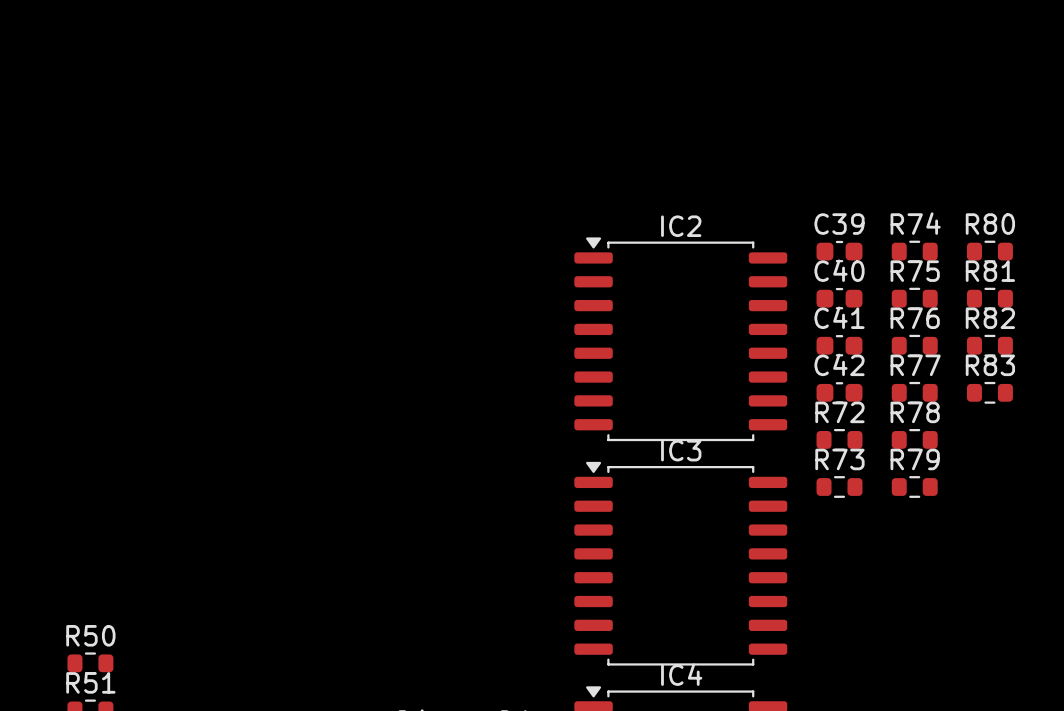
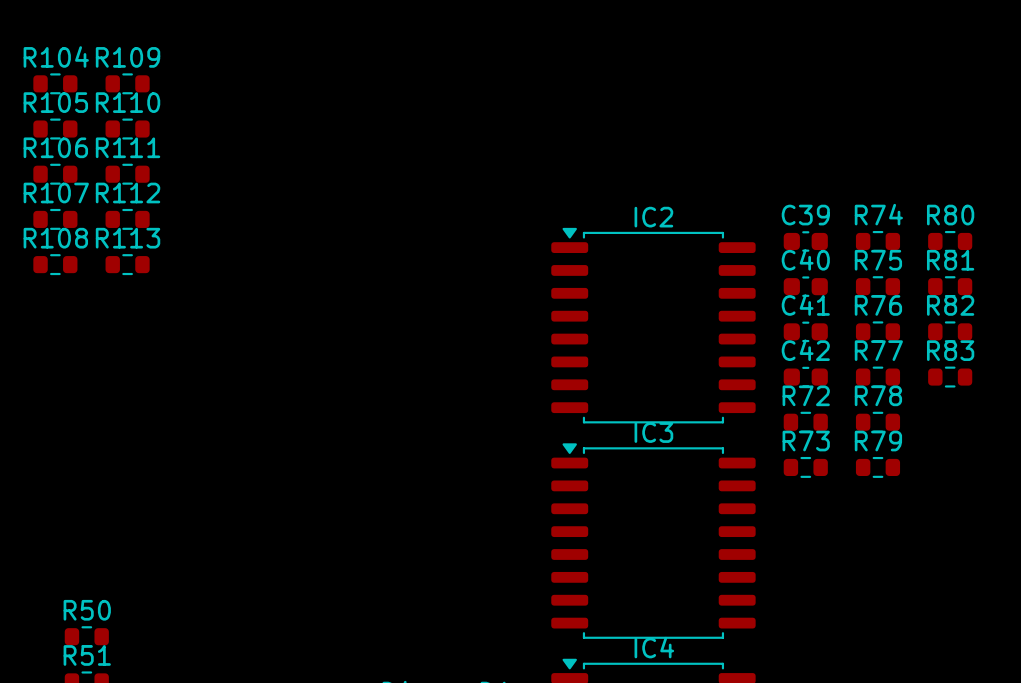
R104: none -> (55, 83)
R109: none -> (127, 83)
R105: none -> (55, 129)
R110: none -> (127, 129)
R106: none -> (55, 174)
R111: none -> (127, 174)
R107: none -> (55, 219)
R112: none -> (127, 219)
R108: none -> (55, 264)
R113: none -> (127, 264)

